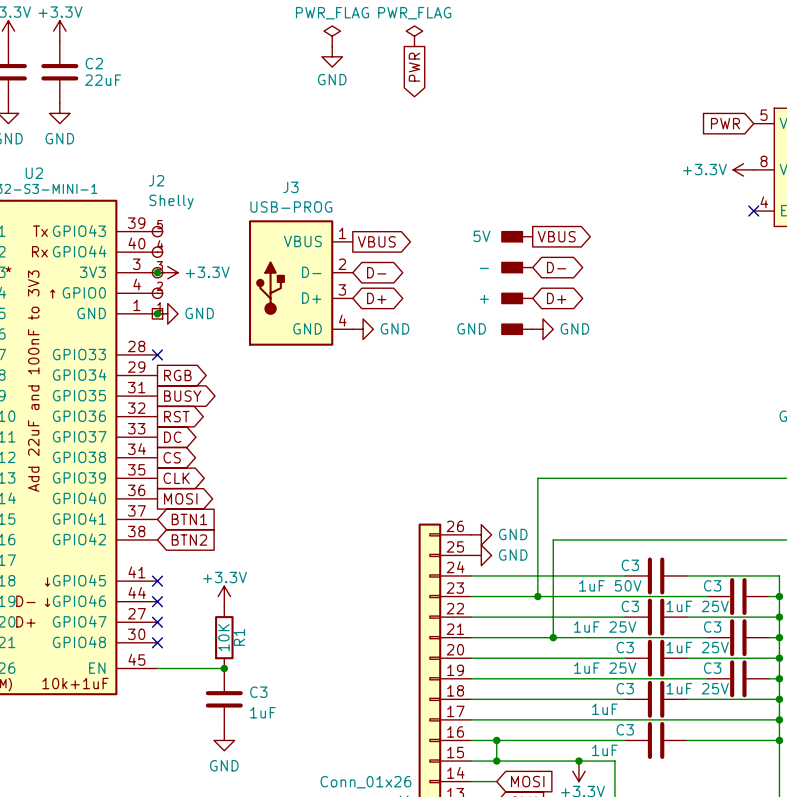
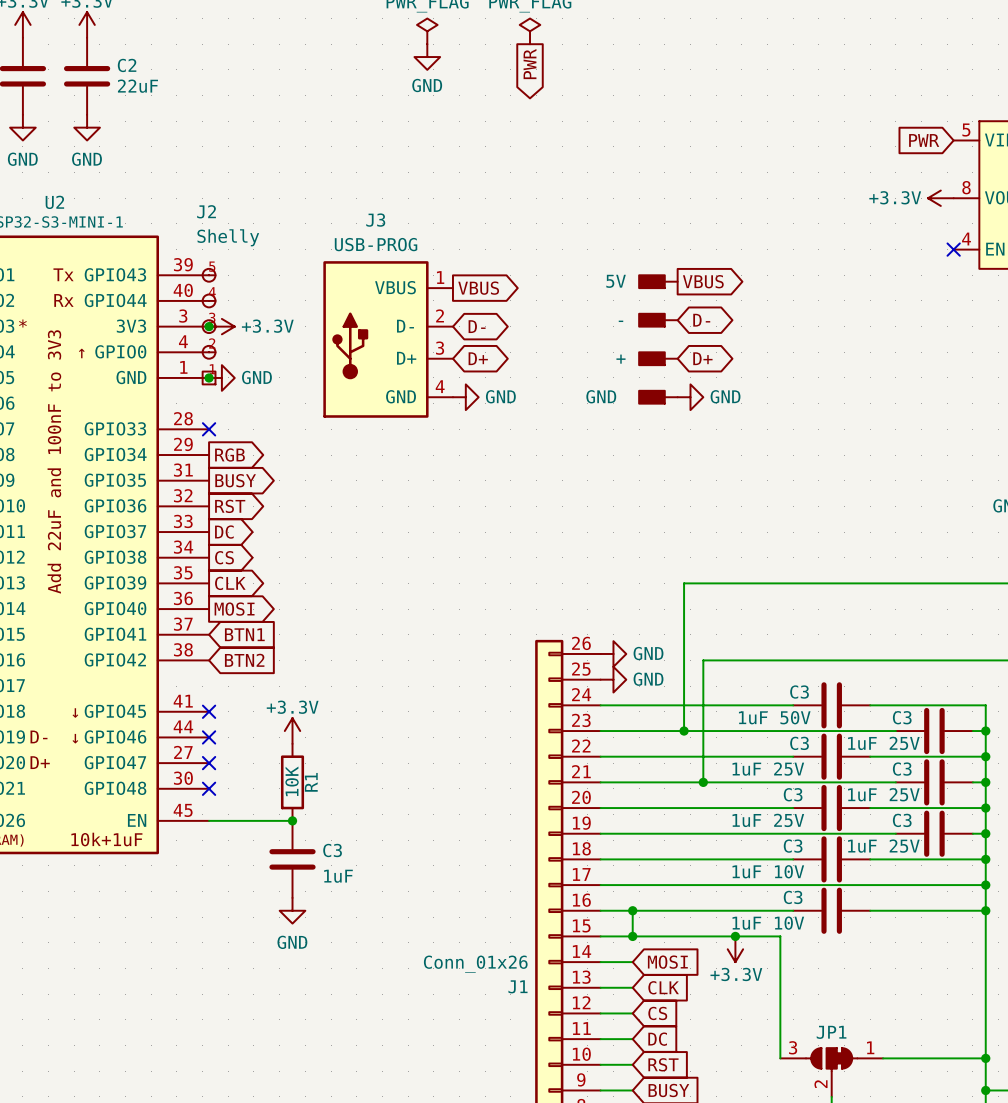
C3 value: 1uF (604, 709) -> 1uF 10V (768, 871)
C3 value: 1uF (604, 750) -> 1uF 10V (768, 923)

